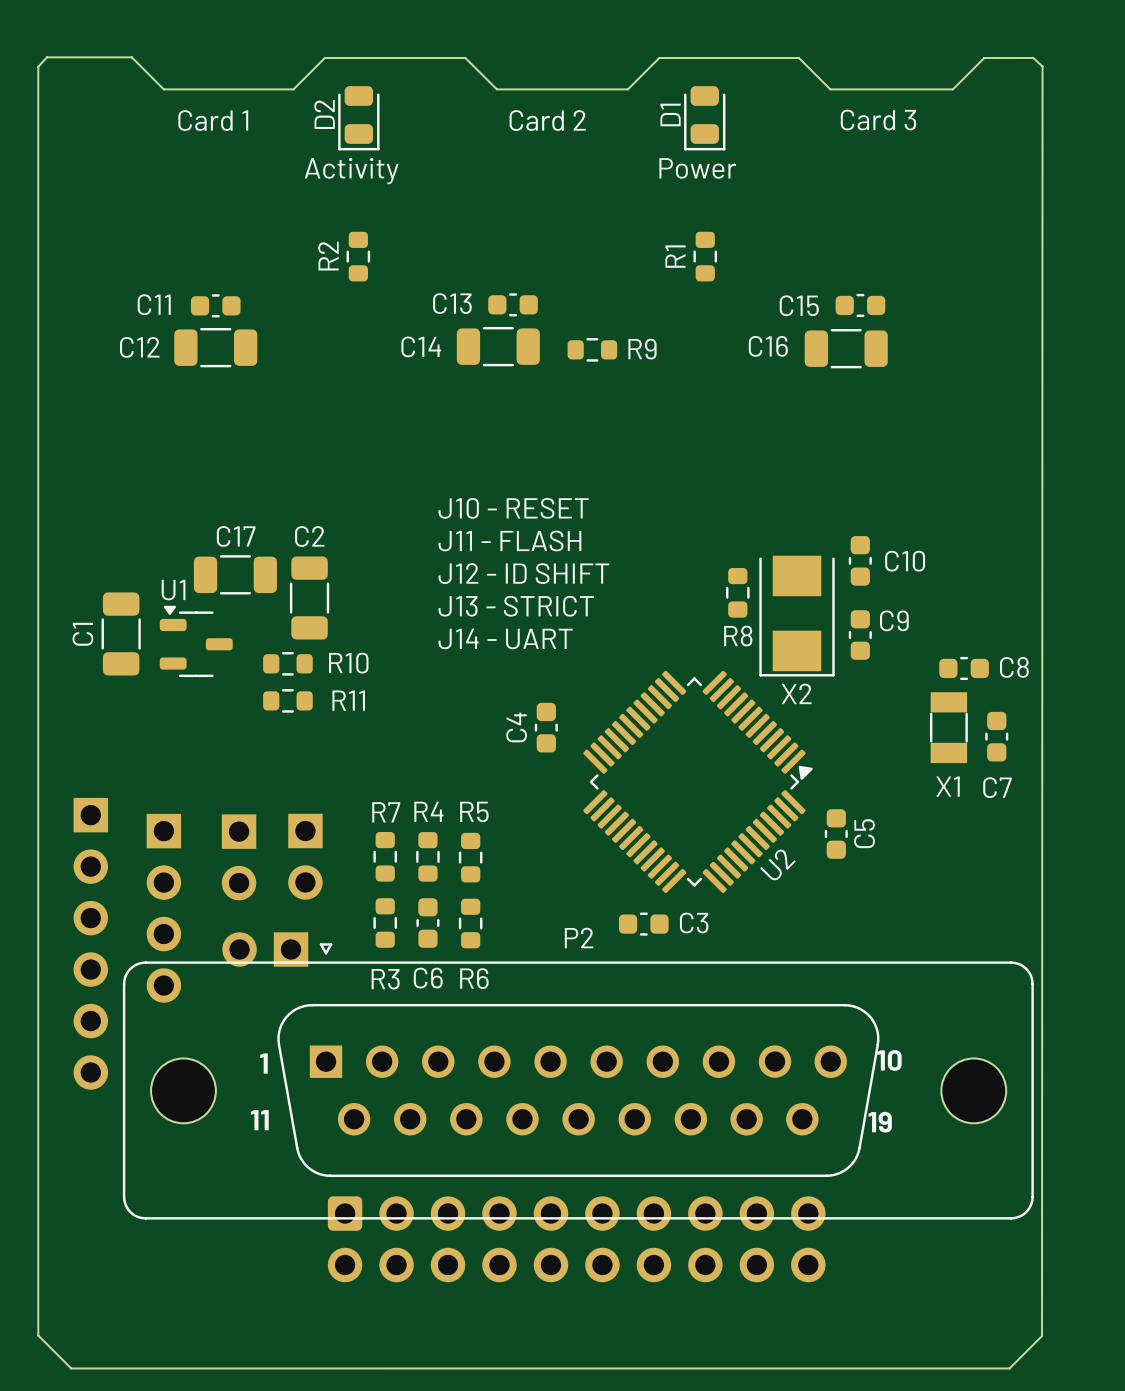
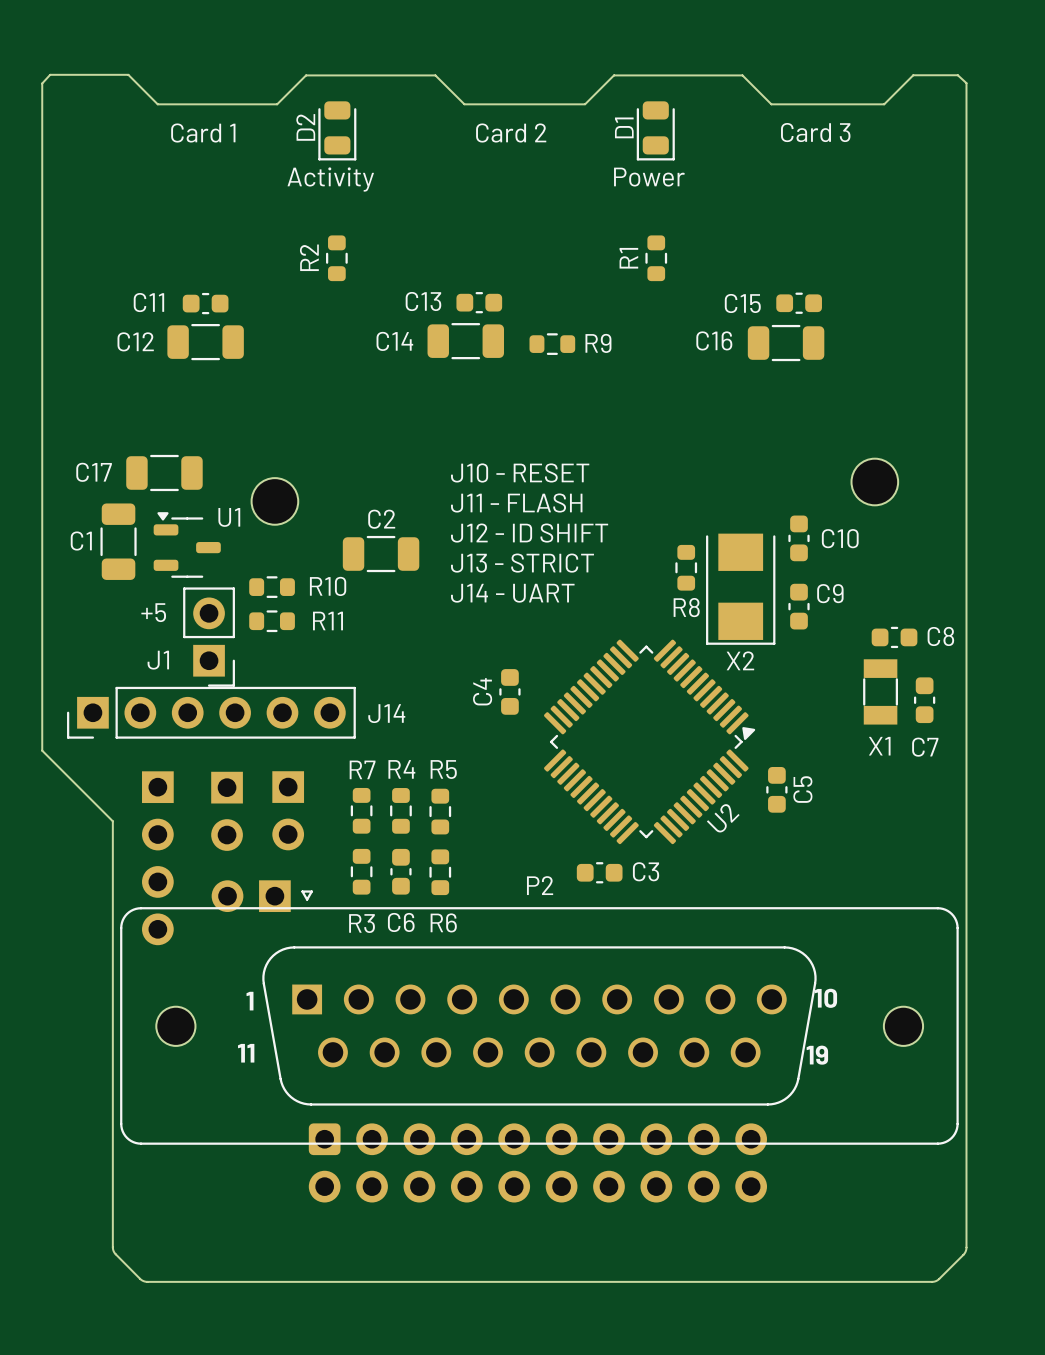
board edge: (984, 57) (1033, 57) (1042, 66) (1042, 1336) (1009, 1368) (71, 1368) (38, 1335) (38, 791) -> (913, 75) (957, 75) (966, 83) (966, 1247) (964, 1254) (938, 1279) (932, 1281) (142, 1280) (115, 1254) (112, 1248) (112, 821) (42, 750)
part: none -> (874, 482)
text position: J10 - RESET (513, 508) -> J10 - RESET (520, 472)
part: none -> (274, 501)
C17 name position: C17 (236, 536) -> C17 (94, 472)
text position: J11 - FLASH (509, 540) -> J11 - FLASH (516, 503)
text position: J12 - ID SHIFT (523, 573) -> J12 - ID SHIFT (529, 533)
C17 position: (235, 574) -> (164, 472)
U1 name position: U1 (173, 590) -> U1 (229, 517)
C2 rotation: 0° (309, 598) -> 90° clockwise (381, 554)
C2 position: (309, 598) -> (381, 554)
text position: J13 - STRICT (516, 606) -> J13 - STRICT (522, 563)
C1 position: (121, 633) -> (118, 541)
C1 name rotation: 0° (82, 634) -> 90° clockwise (81, 541)
text position: J14 - UART (505, 638) -> J14 - UART (512, 593)
text: none -> +5 (153, 612)
U1 position: (196, 641) -> (187, 544)
R10 position: (287, 663) -> (272, 587)
J1: none -> (209, 637)
R11 position: (287, 700) -> (272, 621)
J14 side: bottom (90, 943) -> top (211, 712)
P2 footprint: [122, 943, 1034, 1220] -> [120, 890, 959, 1145]

